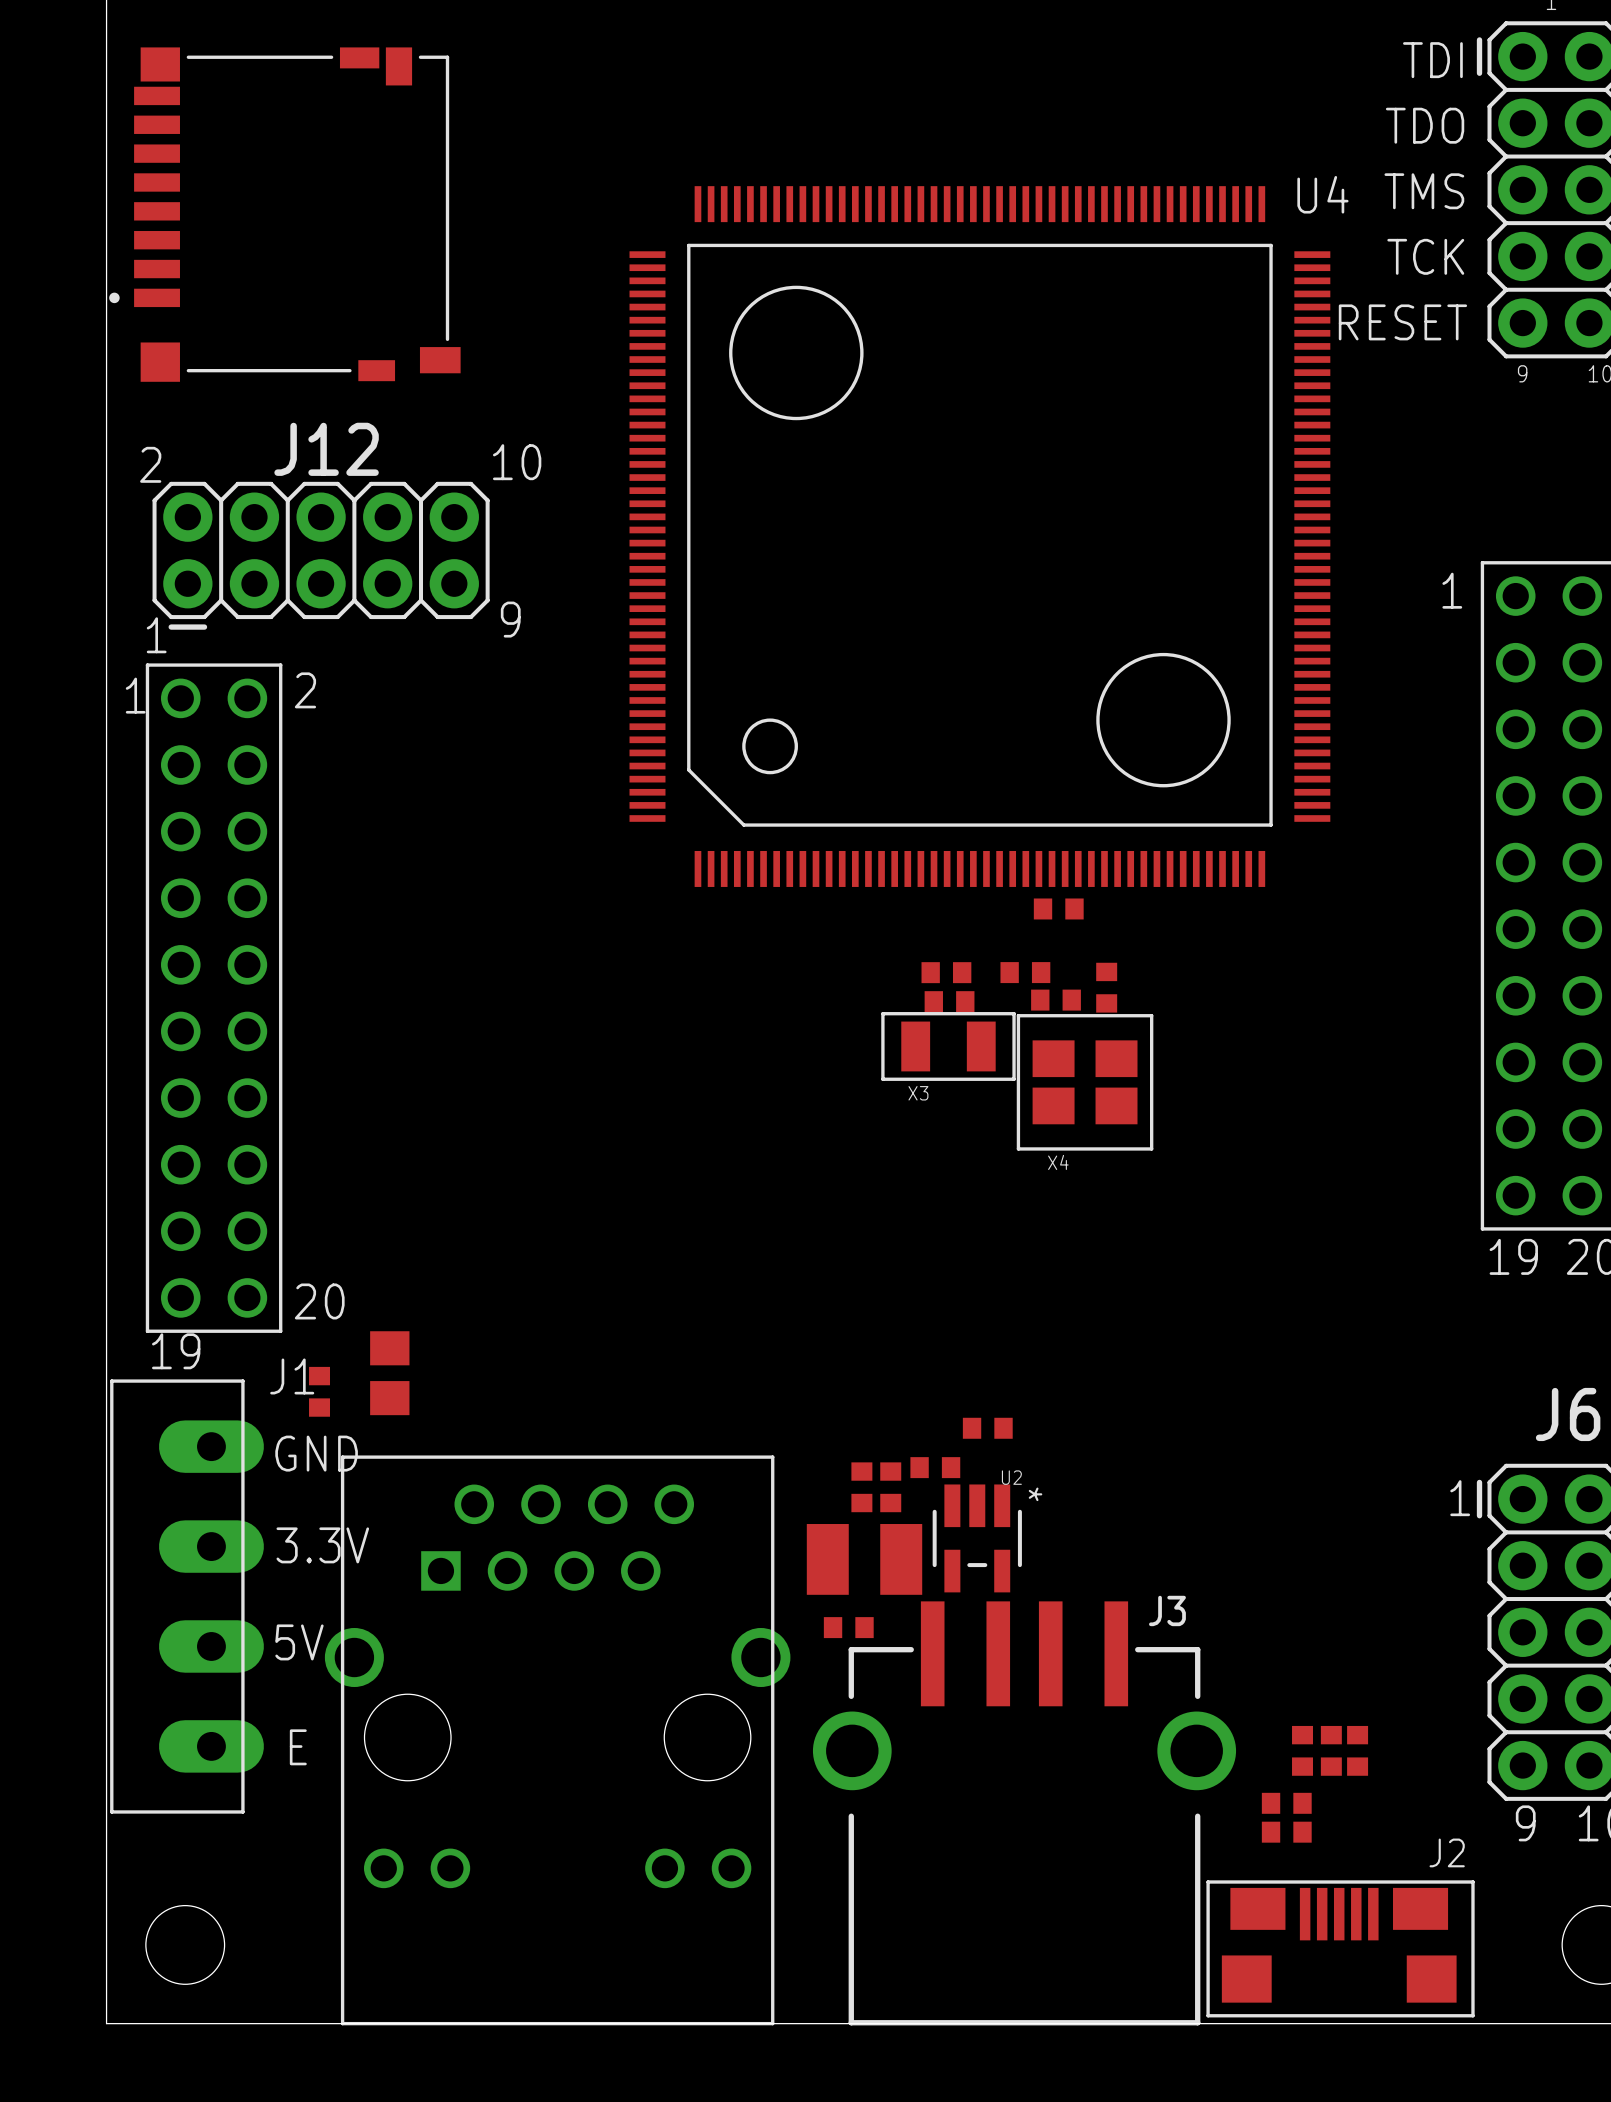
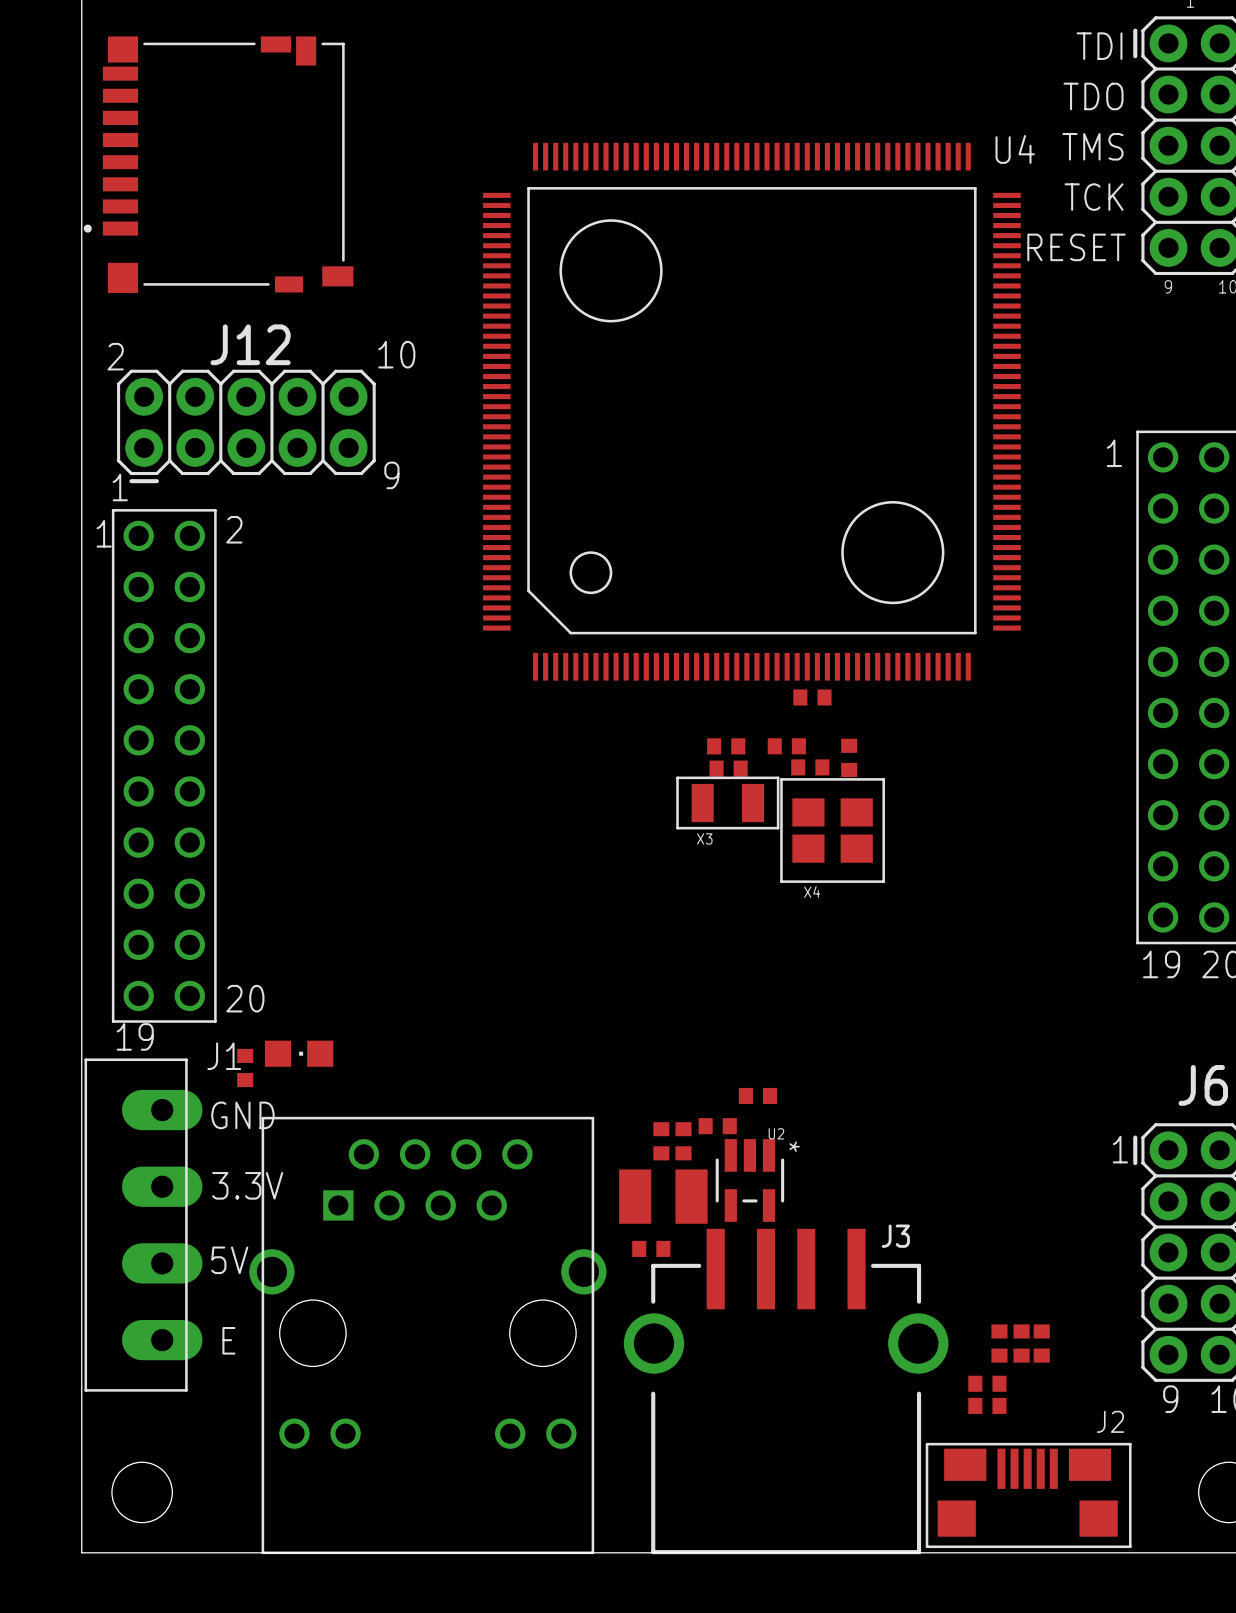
part footprint: [370, 1331, 410, 1416] -> [264, 1040, 334, 1067]

